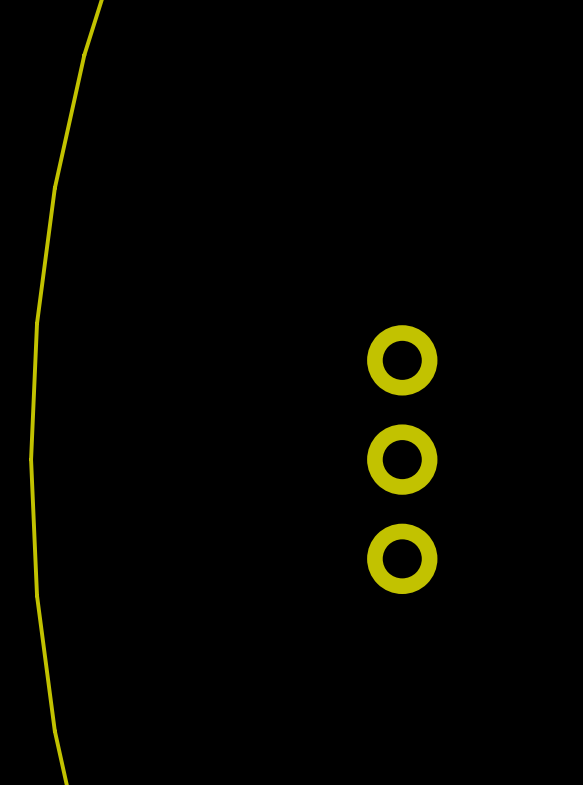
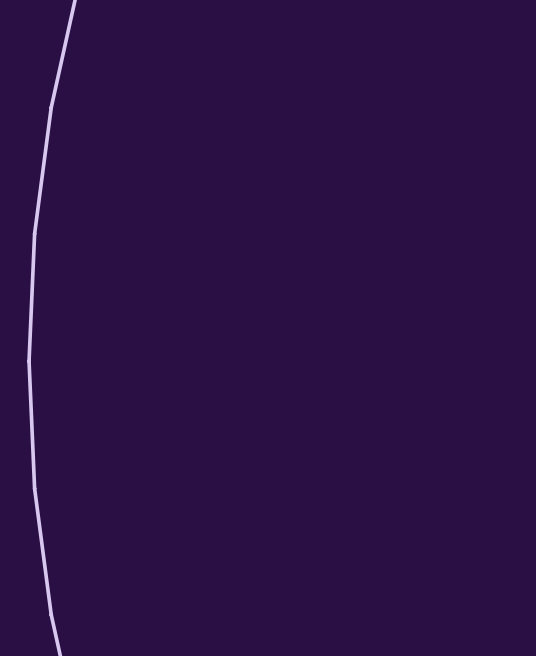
part: (402, 459) -> none

